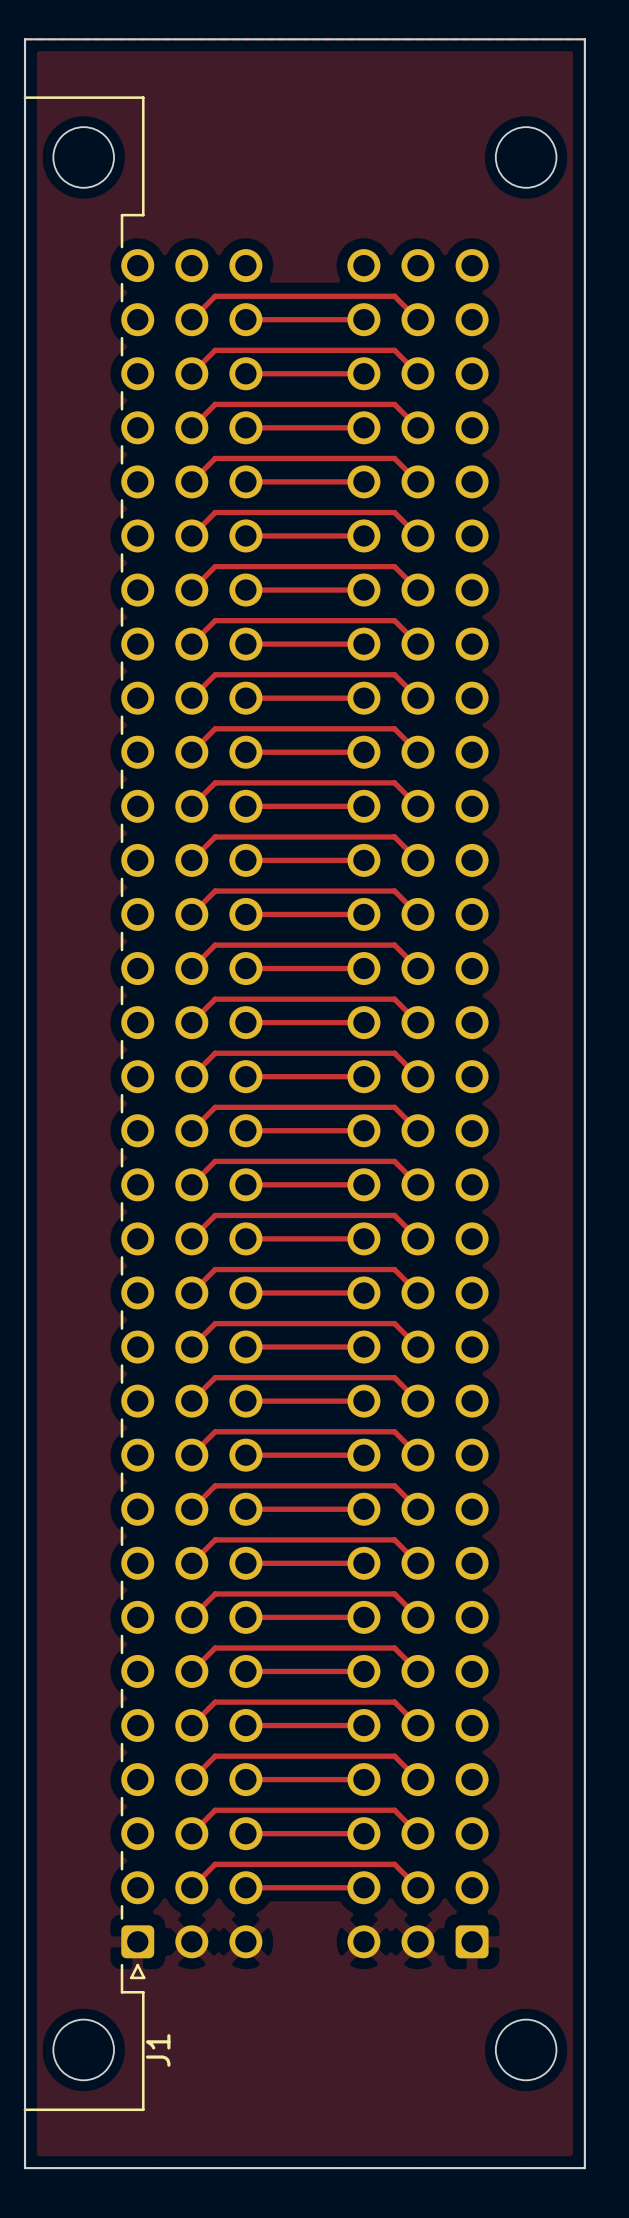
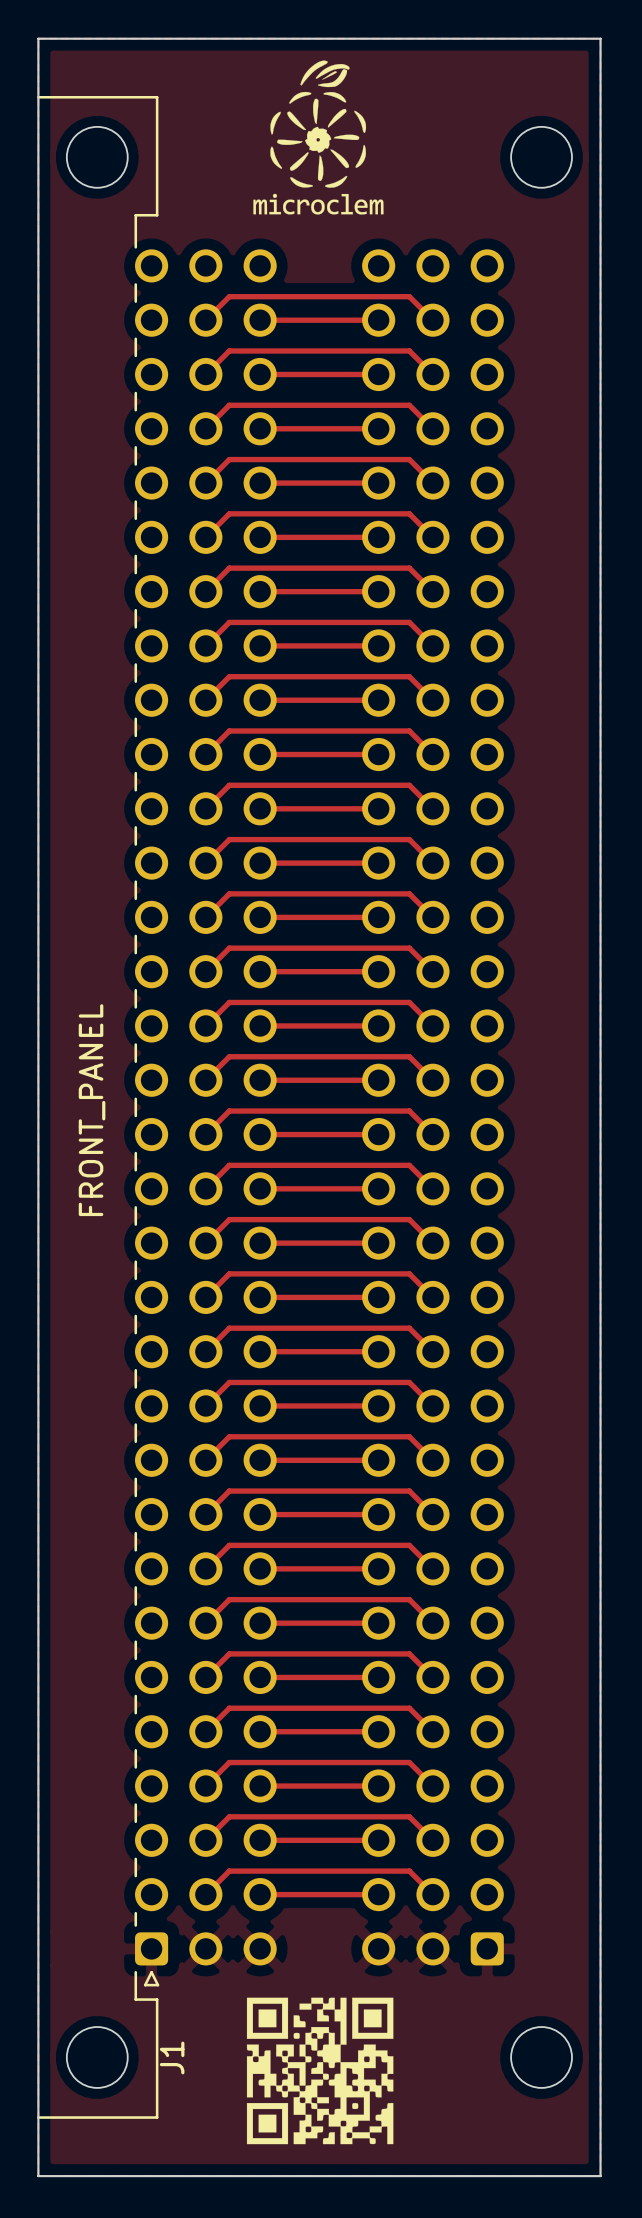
drawing: none -> [253, 60, 384, 215]
text: none -> FRONT_PANEL (92, 1110)
drawing: none -> [246, 1997, 394, 2145]

